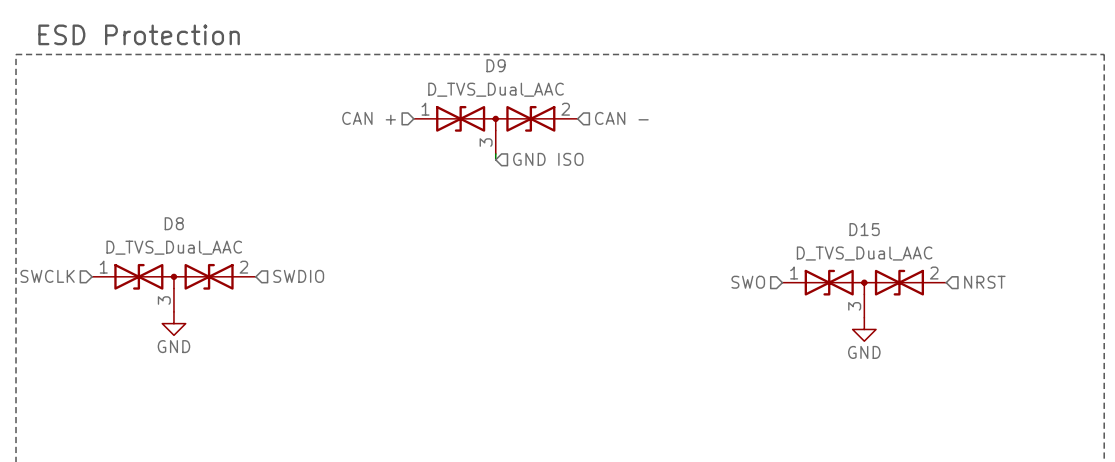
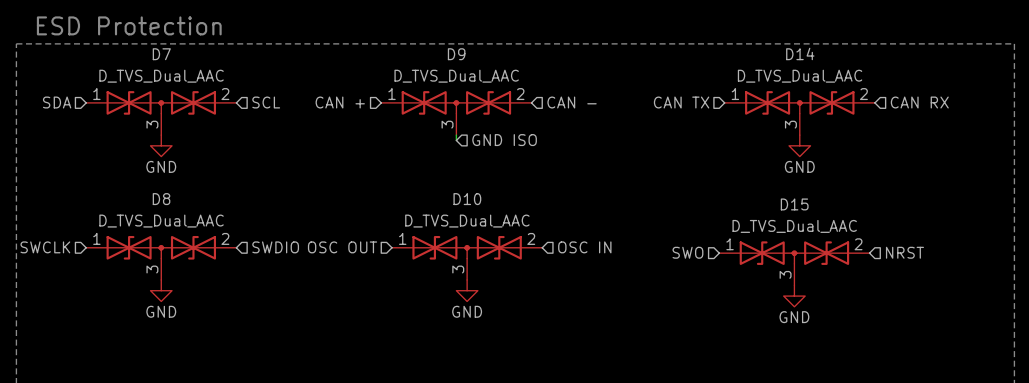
hierarchical label: none -> SDA (57, 102)
hierarchical label: none -> SCL (266, 102)
hierarchical label: none -> CAN TX (681, 102)
hierarchical label: none -> CAN RX (919, 102)
D7: none -> D_TVS_Dual_AAC (161, 113)
D14: none -> D_TVS_Dual_AAC (799, 113)
power symbol: none -> GND (161, 145)
power symbol: none -> GND (799, 145)
hierarchical label: none -> OSC OUT (342, 247)
hierarchical label: none -> OSC IN (584, 247)
D10: none -> D_TVS_Dual_AAC (467, 257)
power symbol: none -> GND (467, 290)

